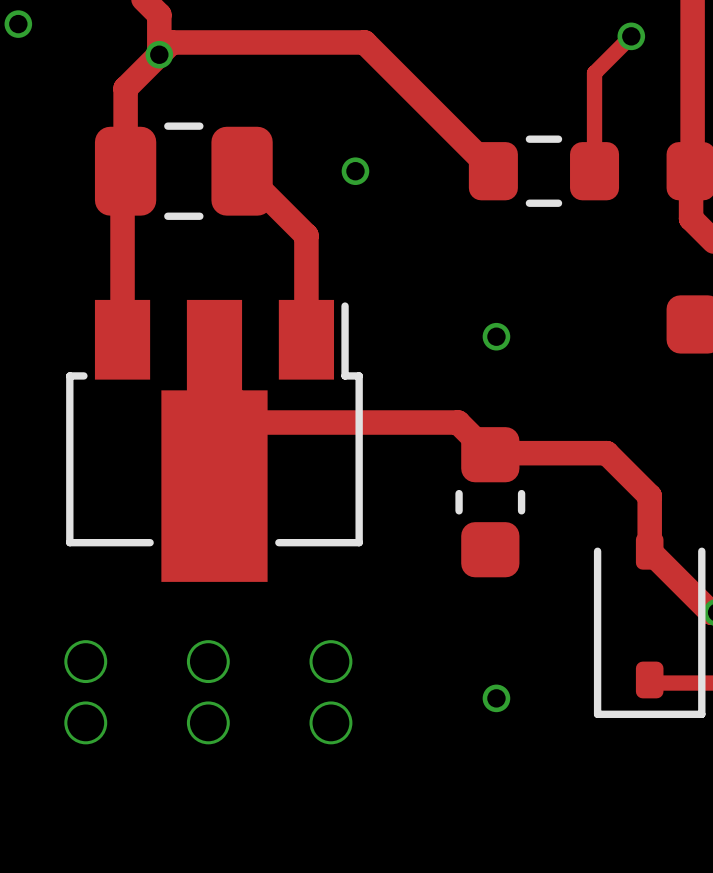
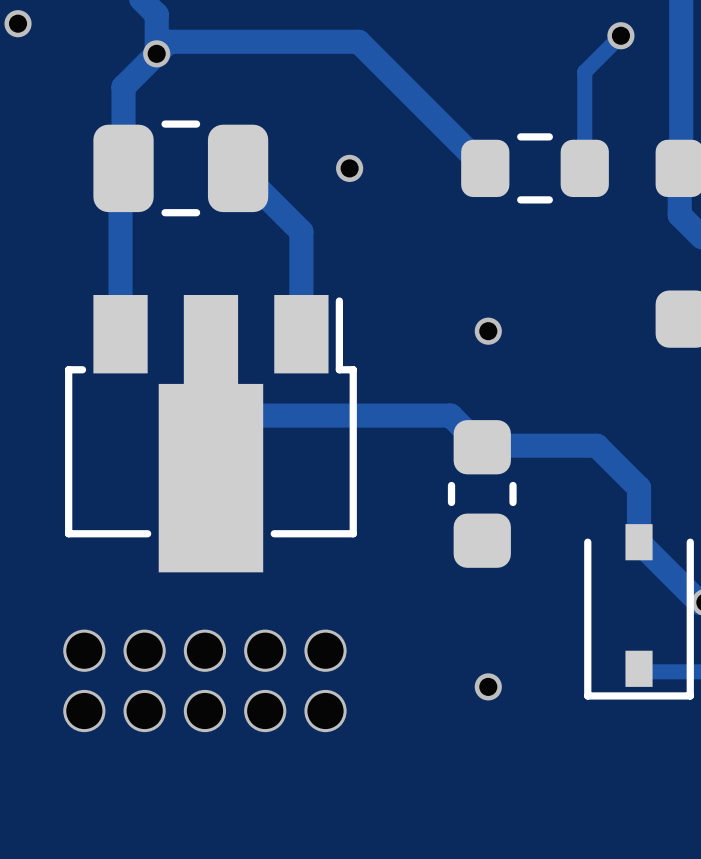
part footprint: [593, 532, 706, 718] -> [584, 524, 694, 700]
via: none -> (144, 650)
via: none -> (265, 650)
via: none -> (144, 711)
via: none -> (265, 711)

